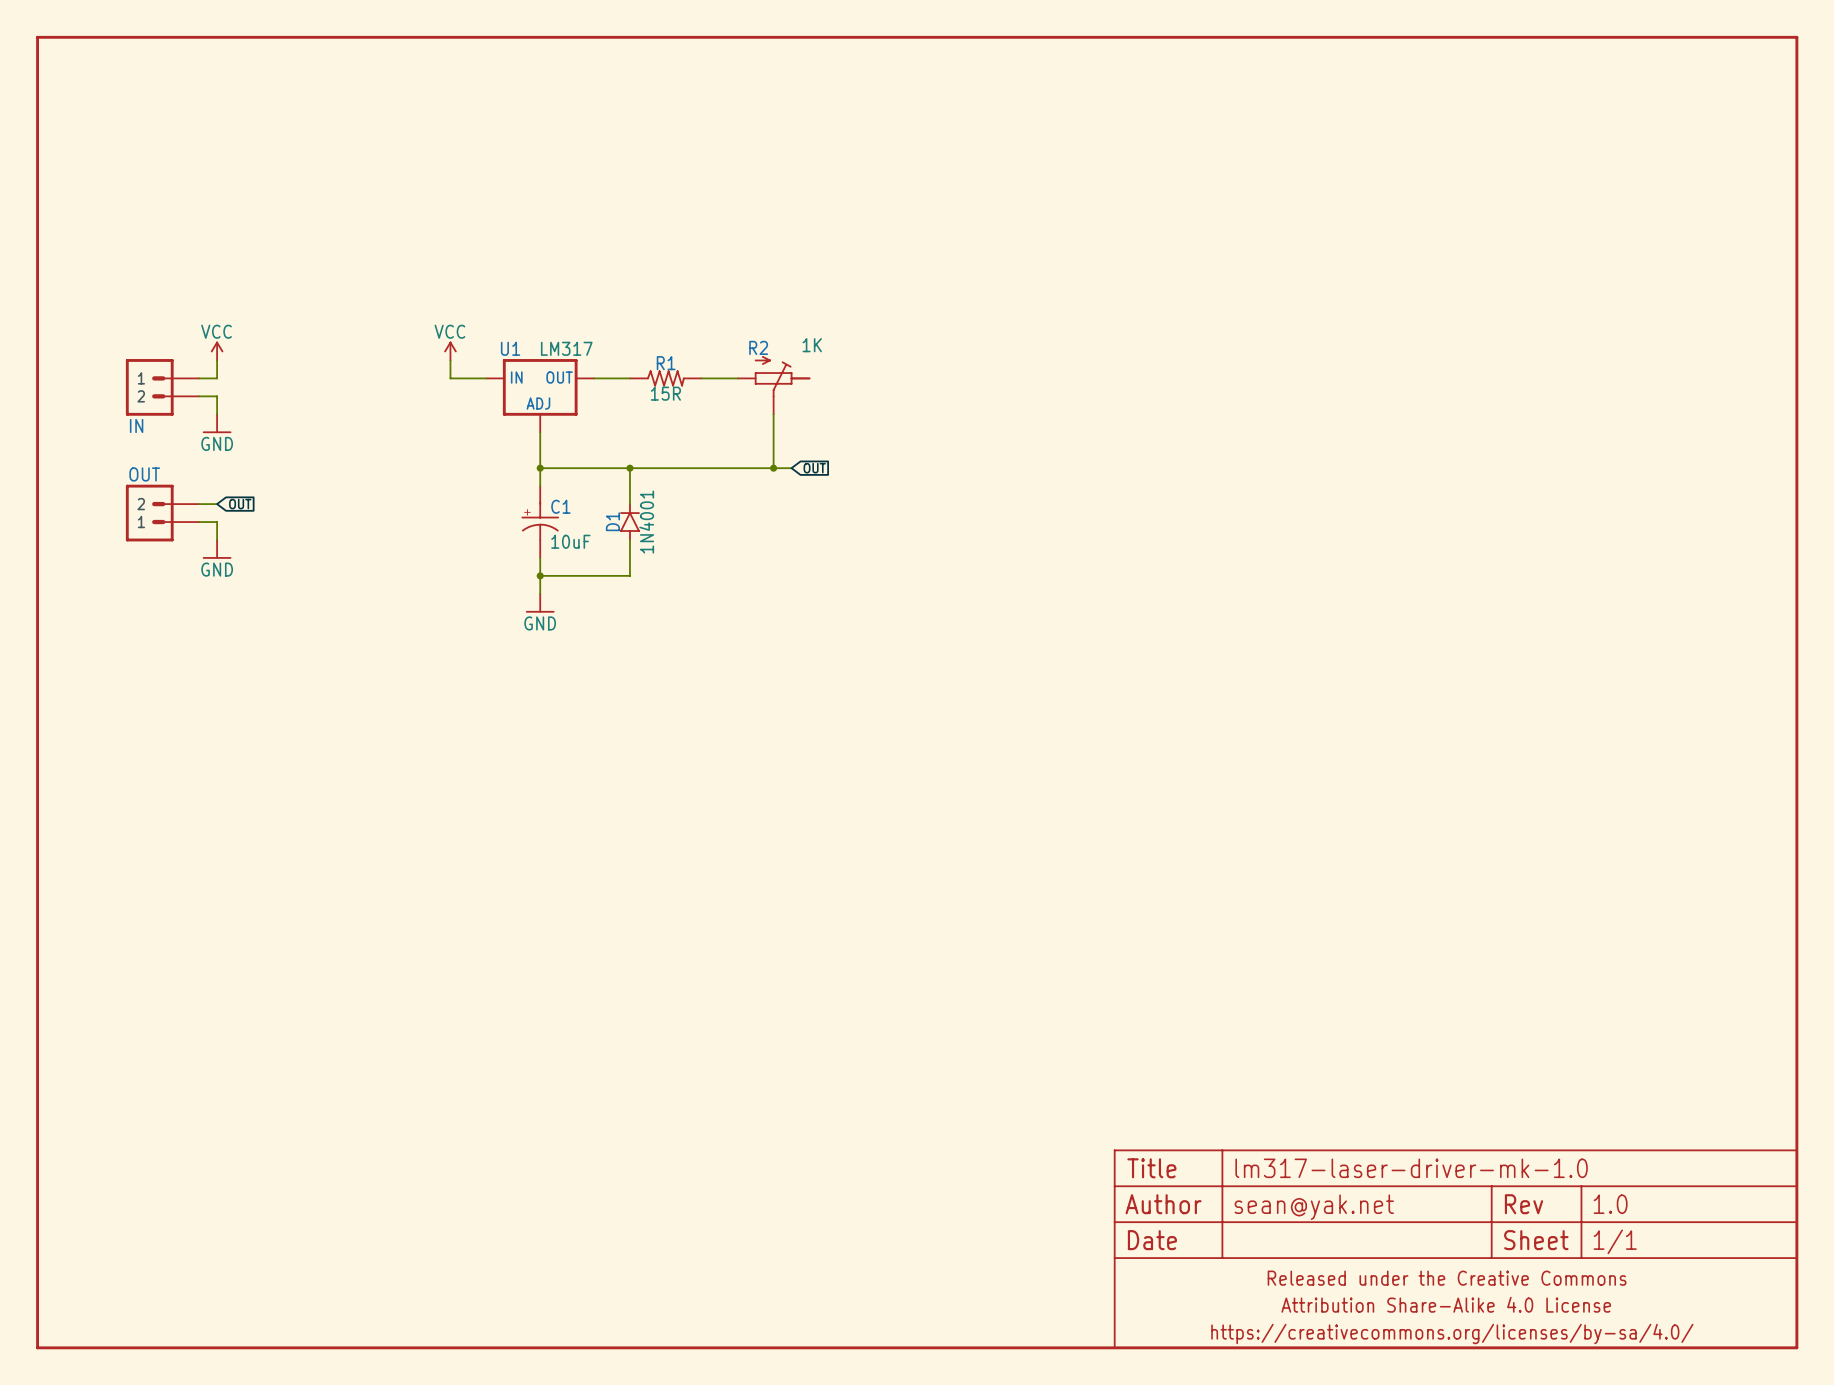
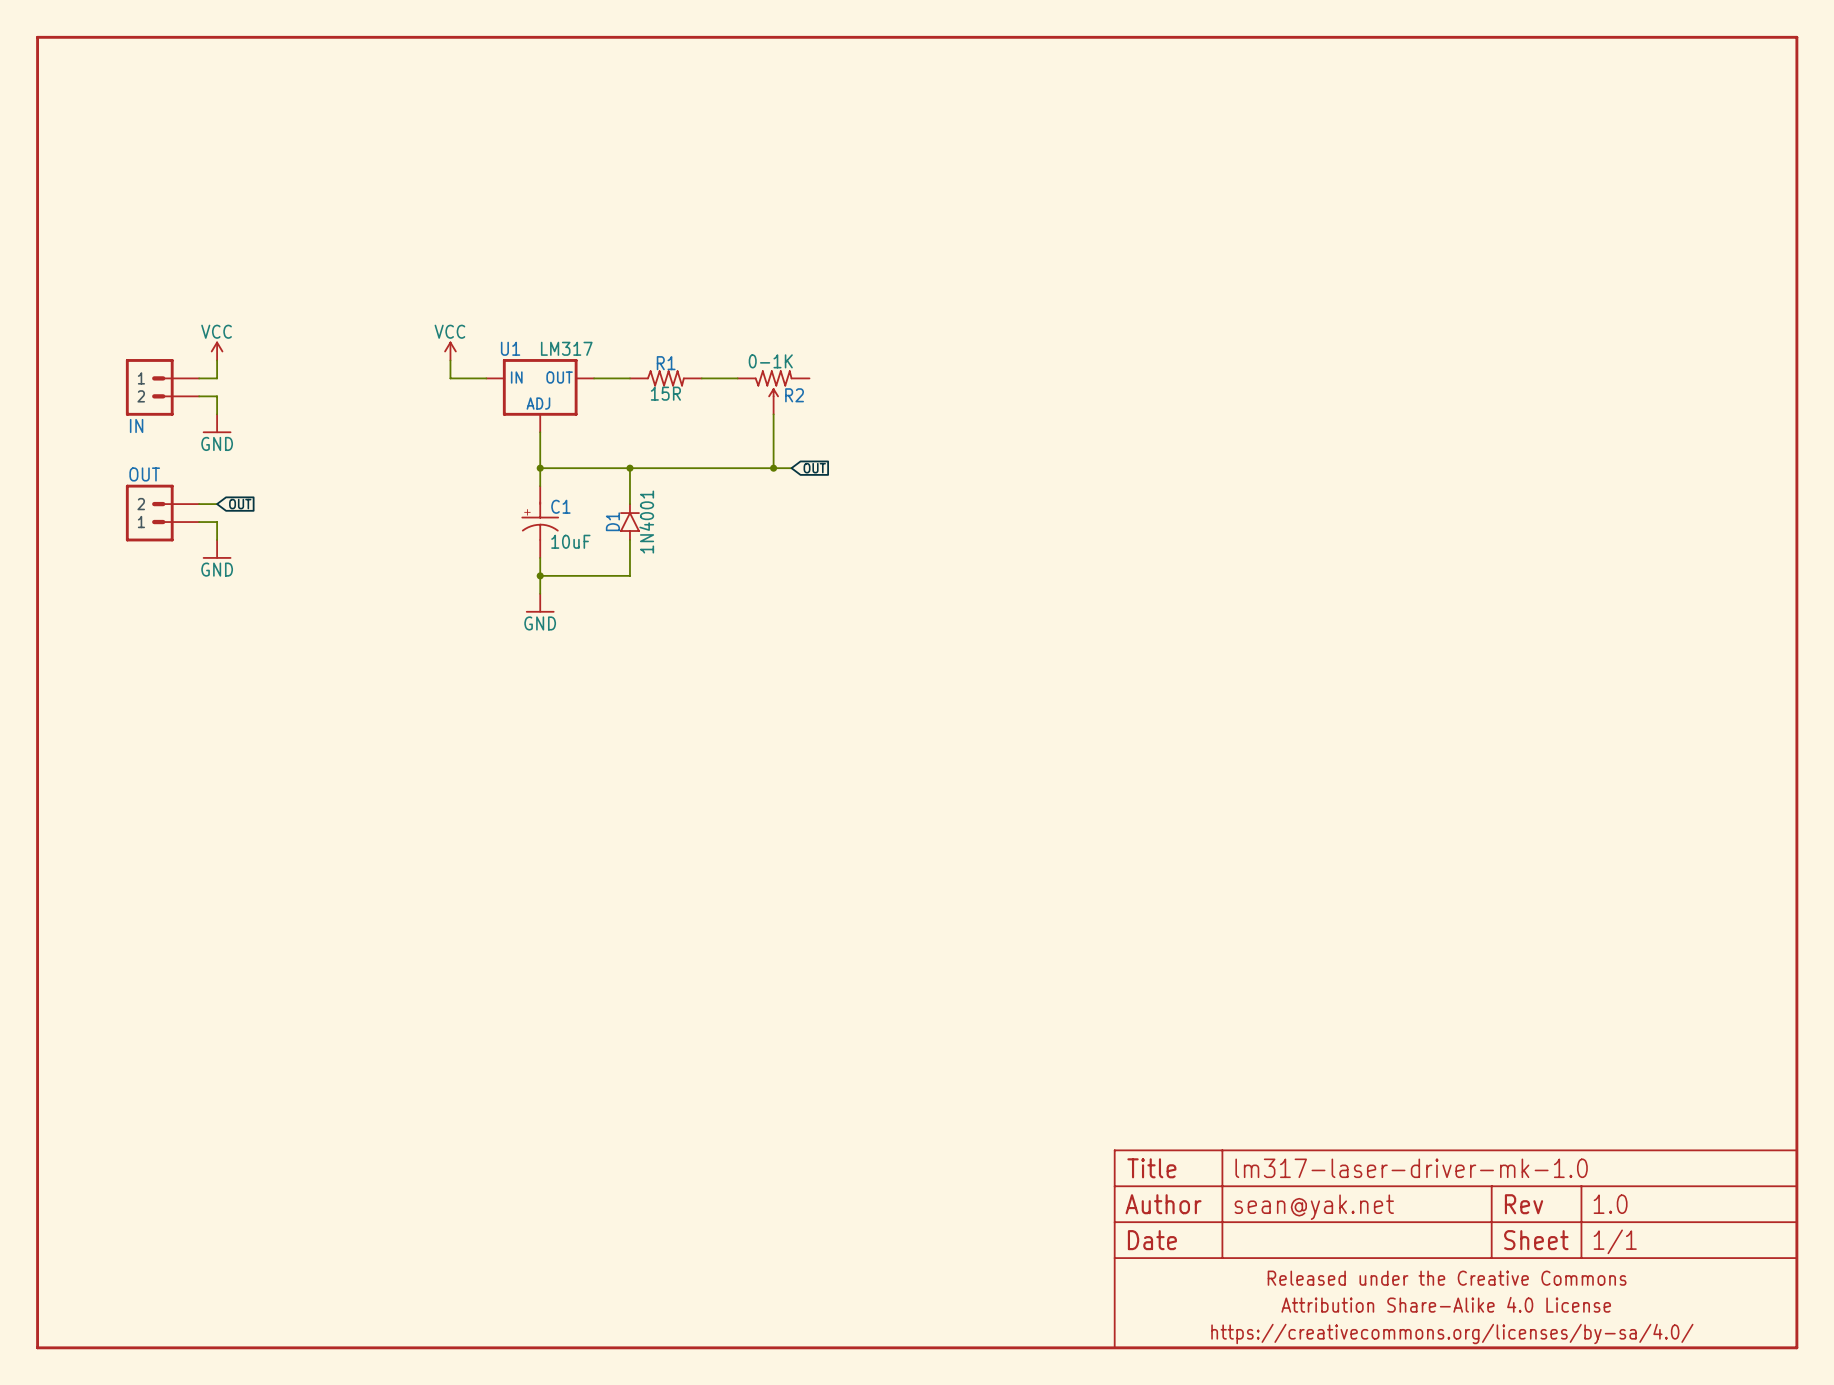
R2 value: 1K (812, 345) -> 0-1K (770, 361)
R2 name position: R2 (758, 347) -> R2 (794, 395)
R2 symbol: [737, 356, 811, 415] -> [737, 370, 810, 415]

